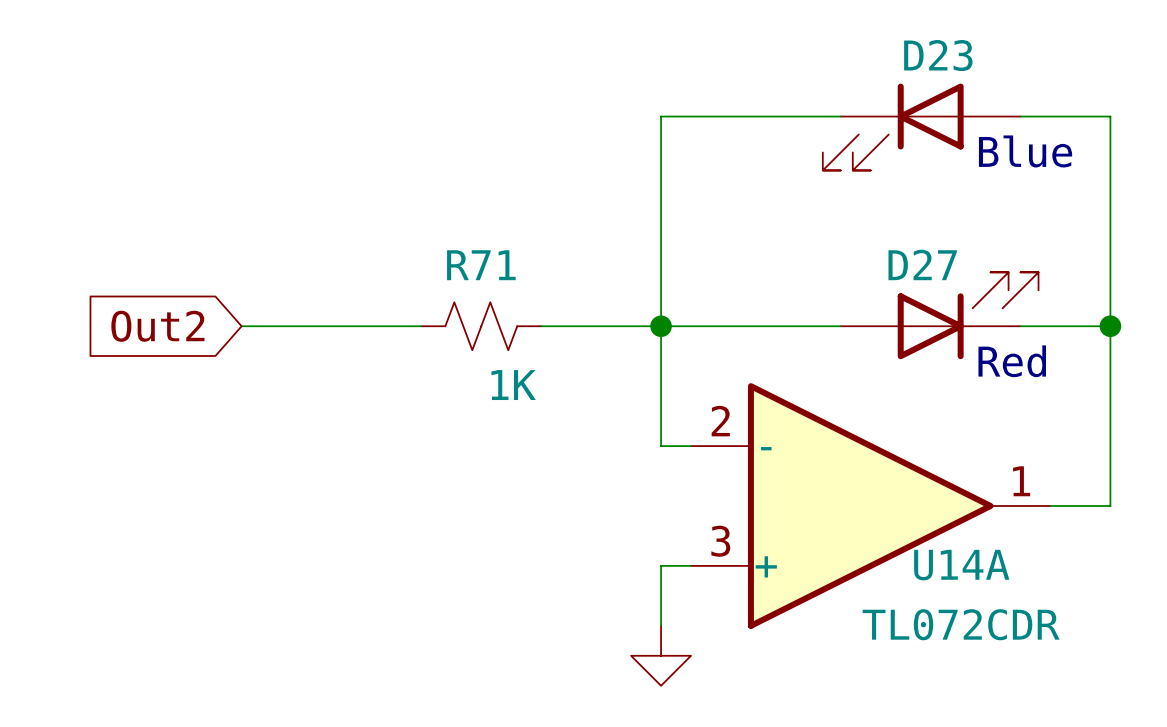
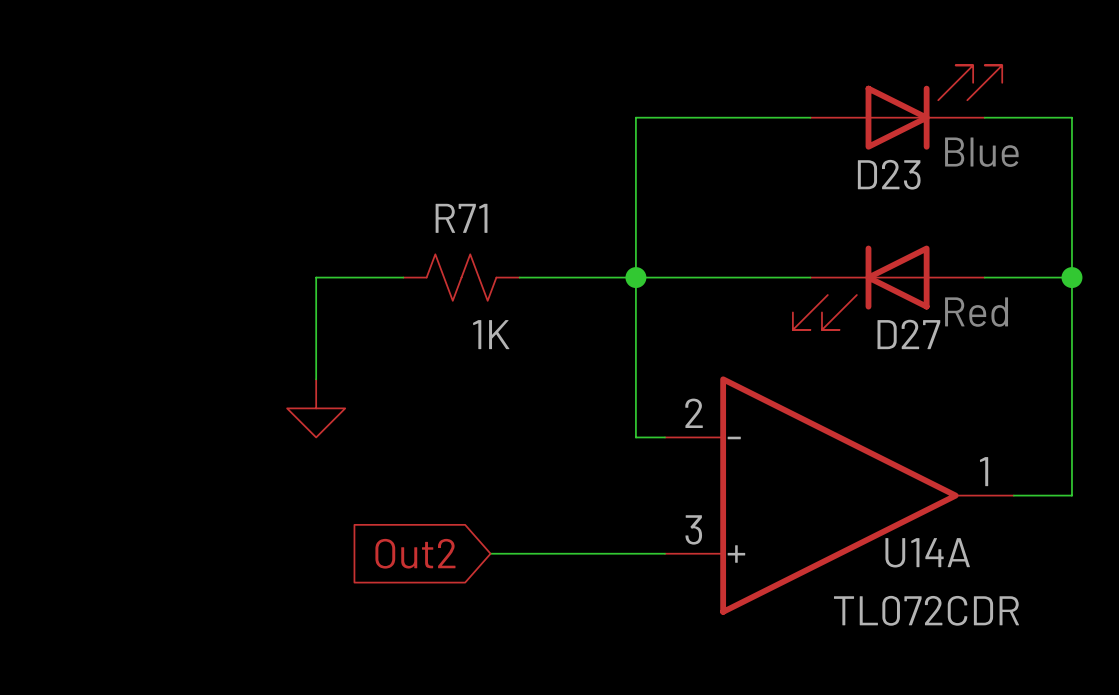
D23 rotation: 0° (893, 127) -> 180° (933, 107)
wire: none -> (403, 277) (316, 277) (316, 379)
D27 rotation: 0° (968, 315) -> 180° (861, 287)
global label position: Out2 (157, 326) -> Out2 (415, 553)
wire: (241, 326) (421, 326) -> none
R71 position: (481, 326) -> (461, 277)
wire: (541, 326) (840, 326) -> (519, 277) (810, 277)
junction position: (661, 326) -> (635, 277)
wire: (1020, 326) (1110, 326) -> (984, 277) (1071, 277)
junction position: (1110, 326) -> (1071, 277)
text position: Red (1012, 361) -> Red (976, 312)
wire: (661, 565) (661, 625) -> (635, 553) (490, 553)
power symbol position: (661, 655) -> (316, 408)

